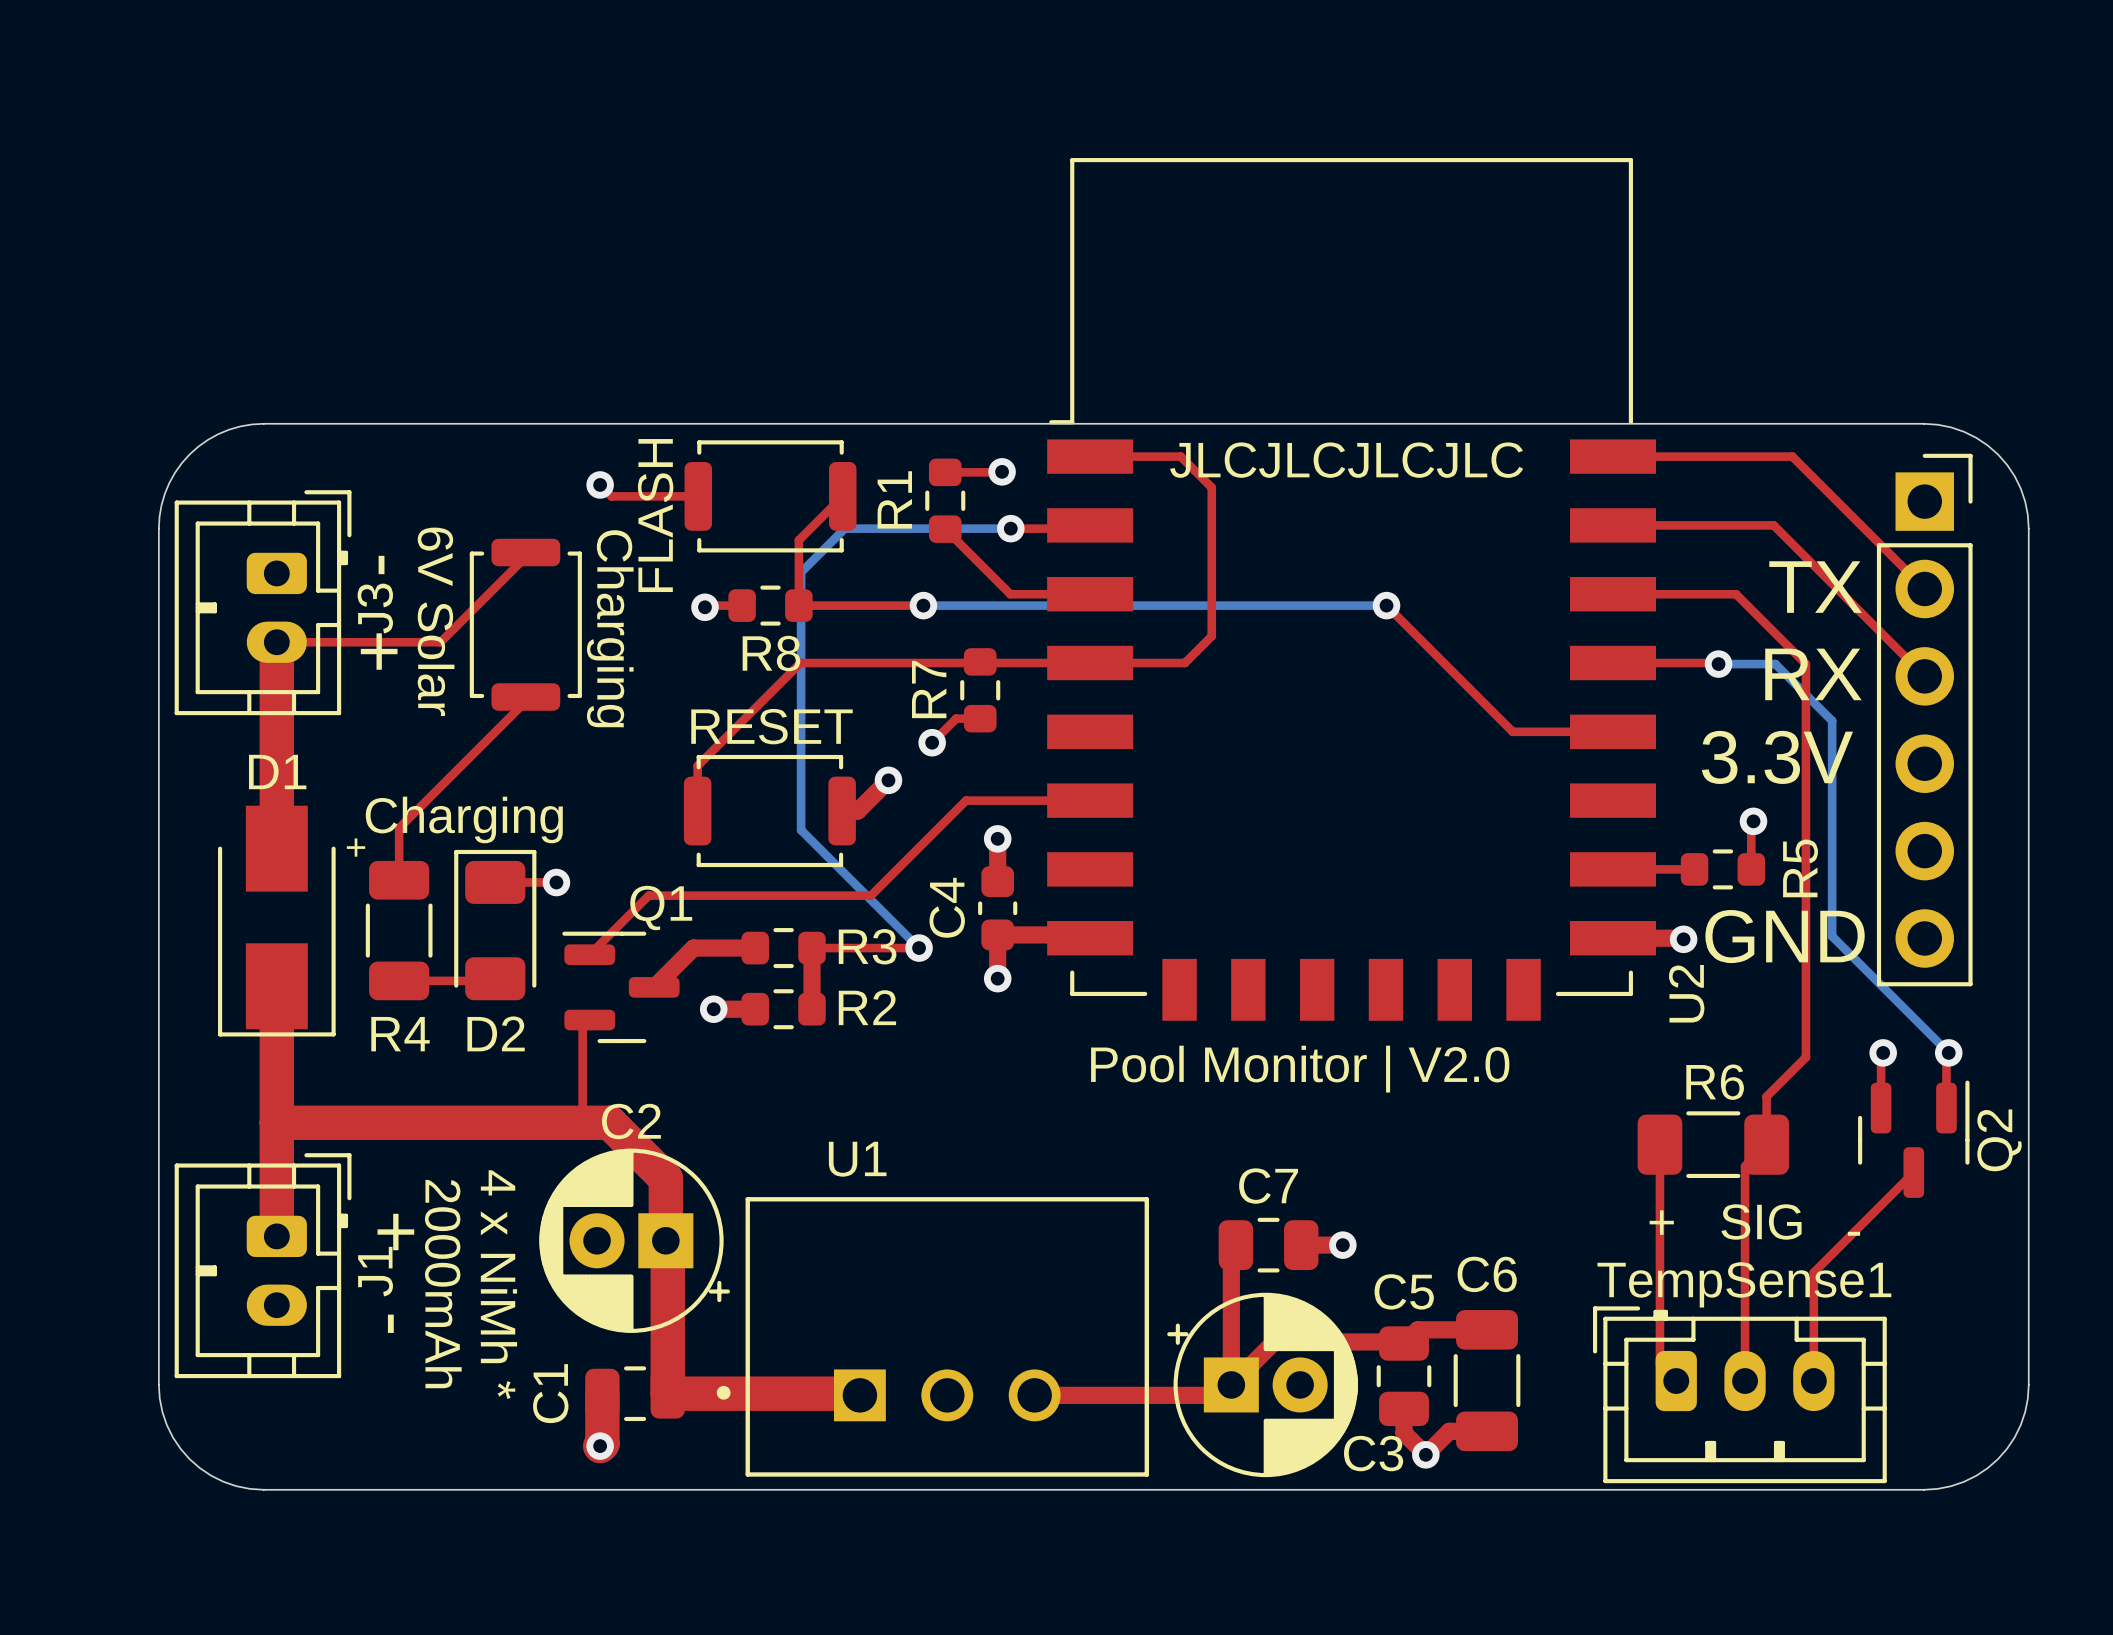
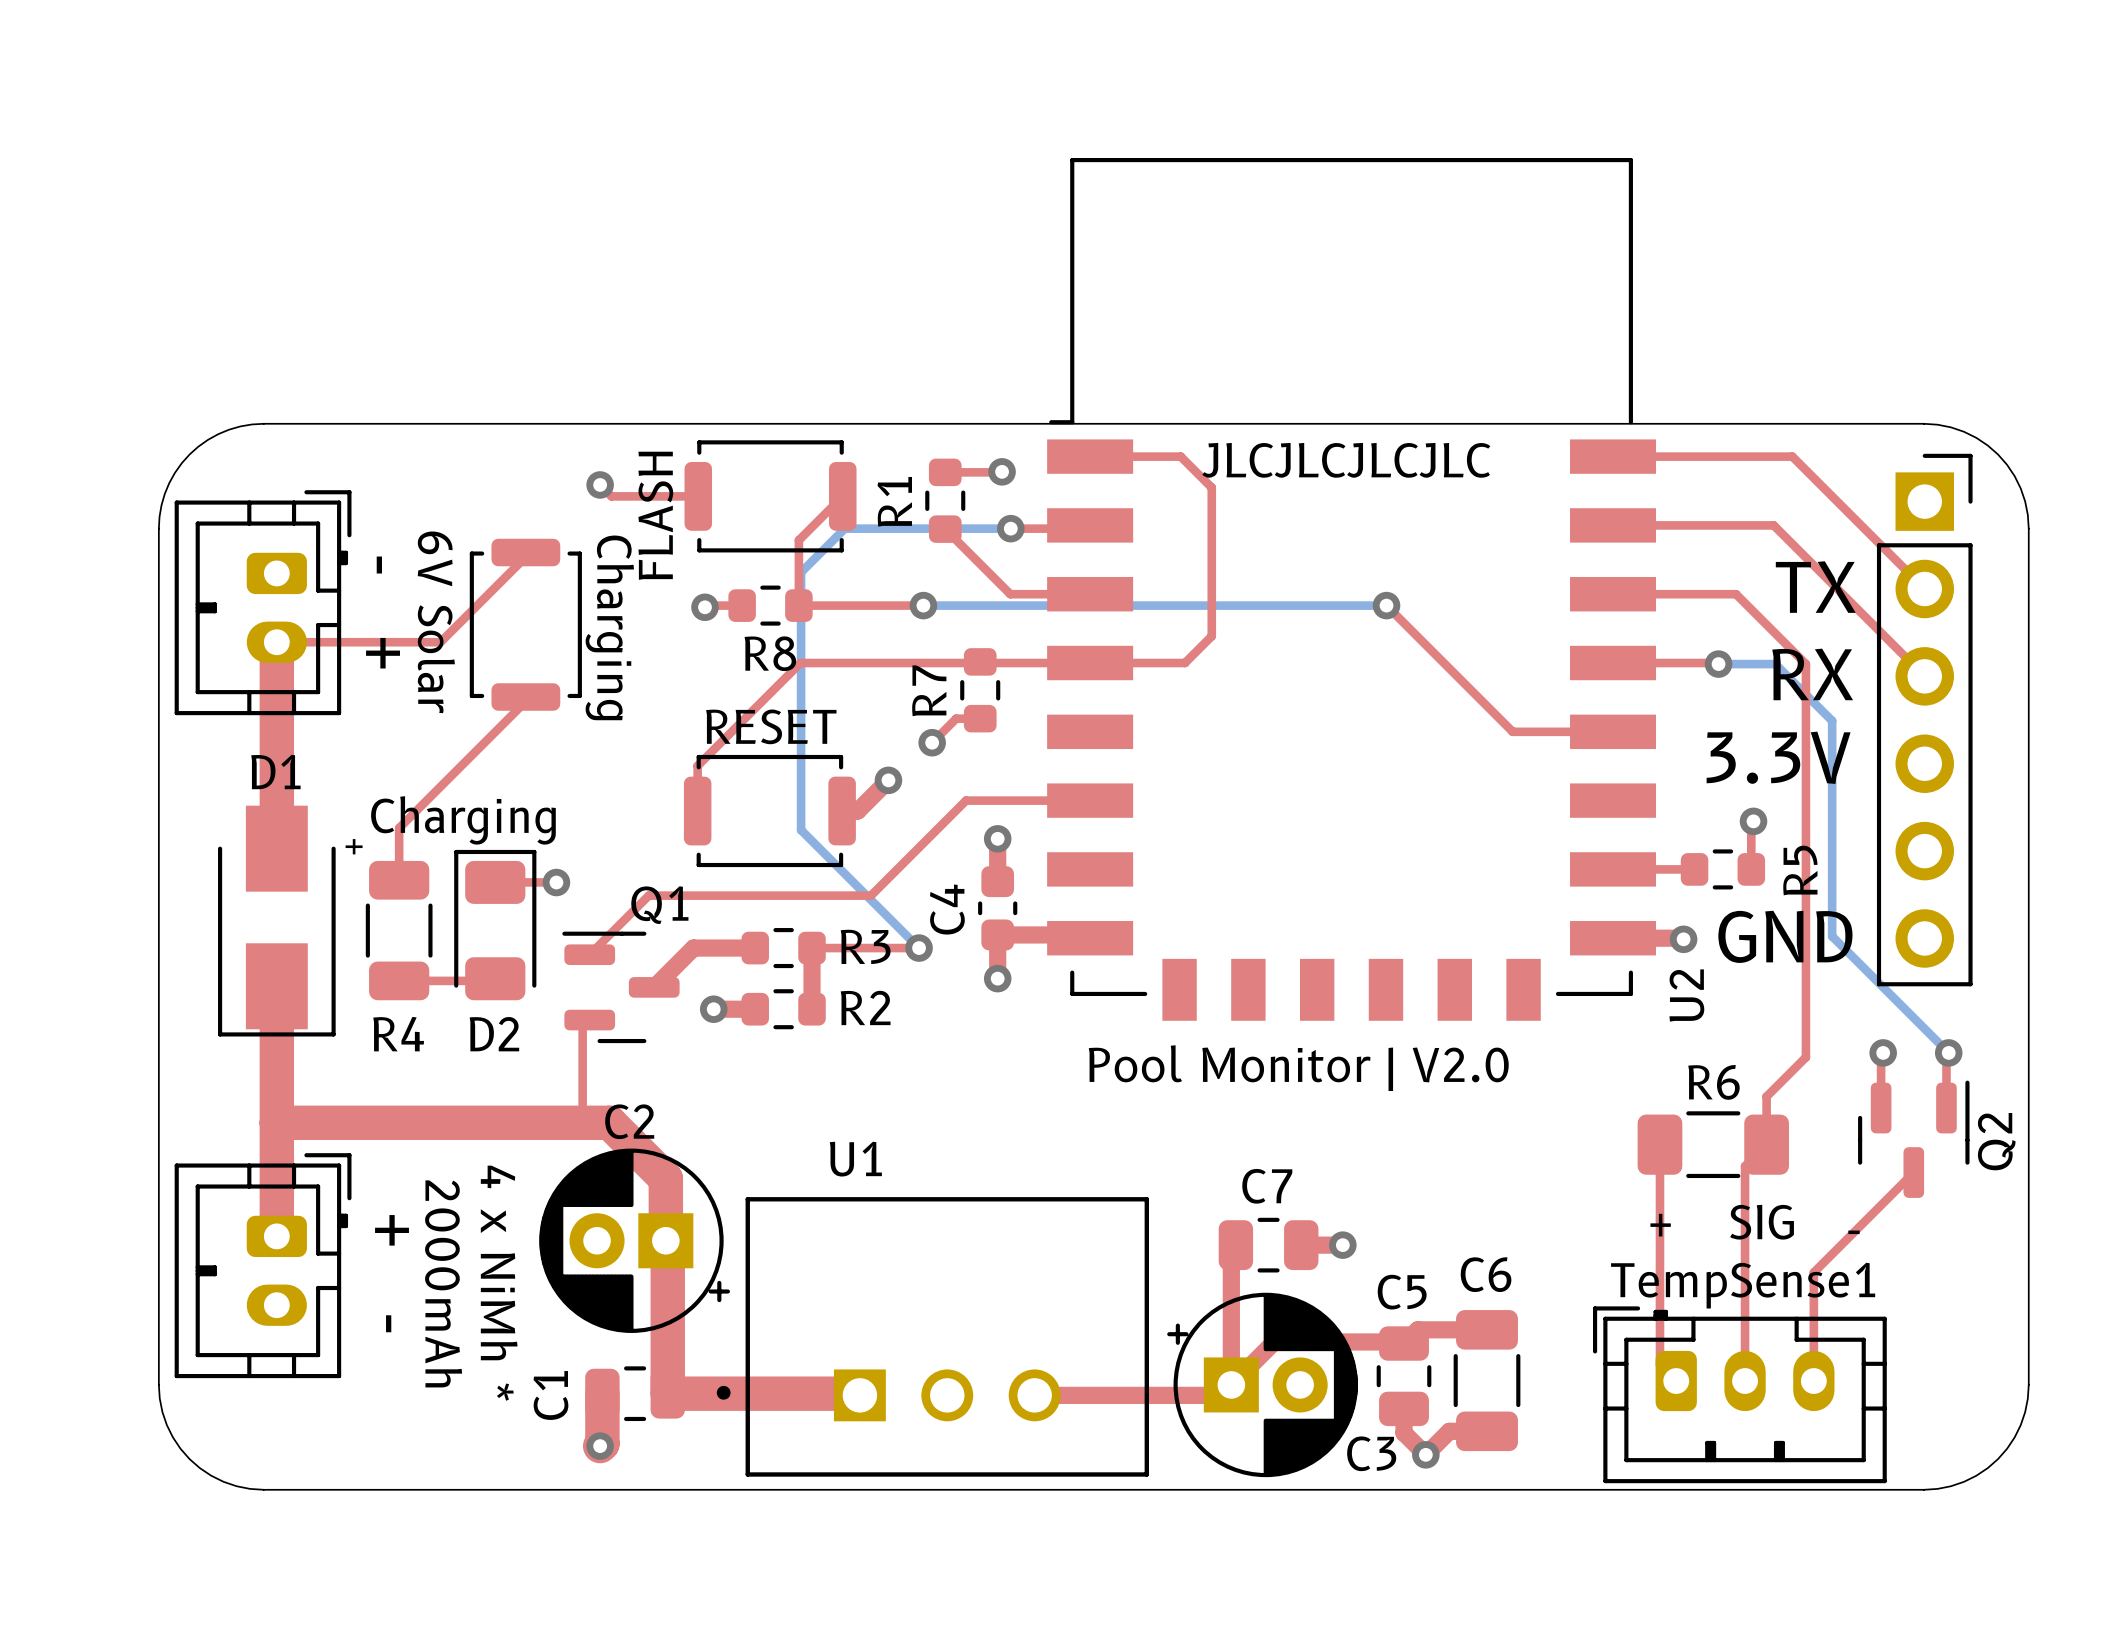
J3 name: J3 (375, 608) -> none
J1 name: J1 (375, 1271) -> none

